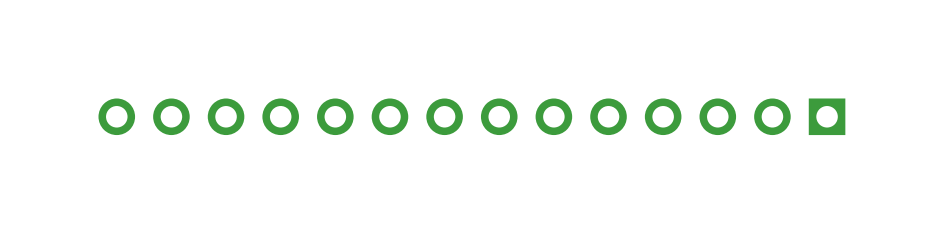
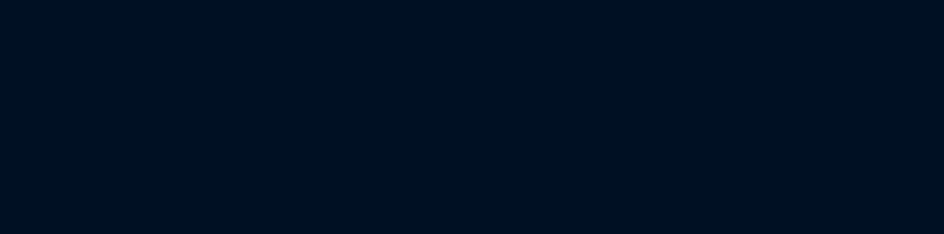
part: (471, 116) -> none

